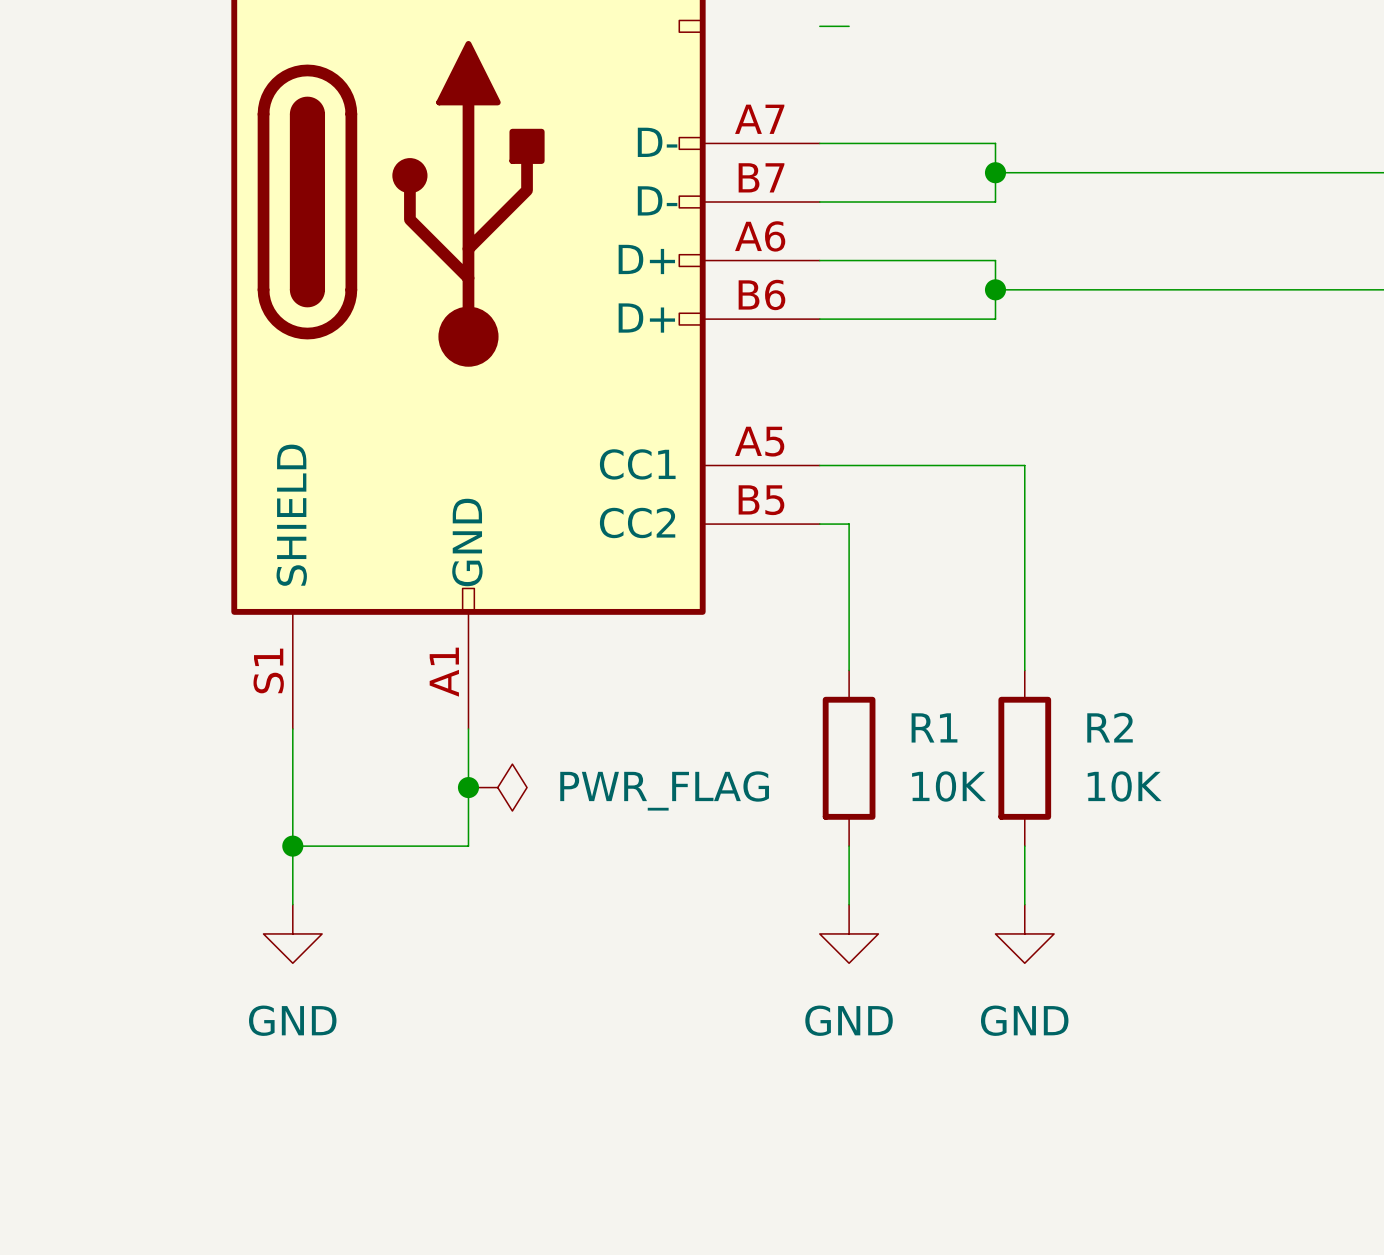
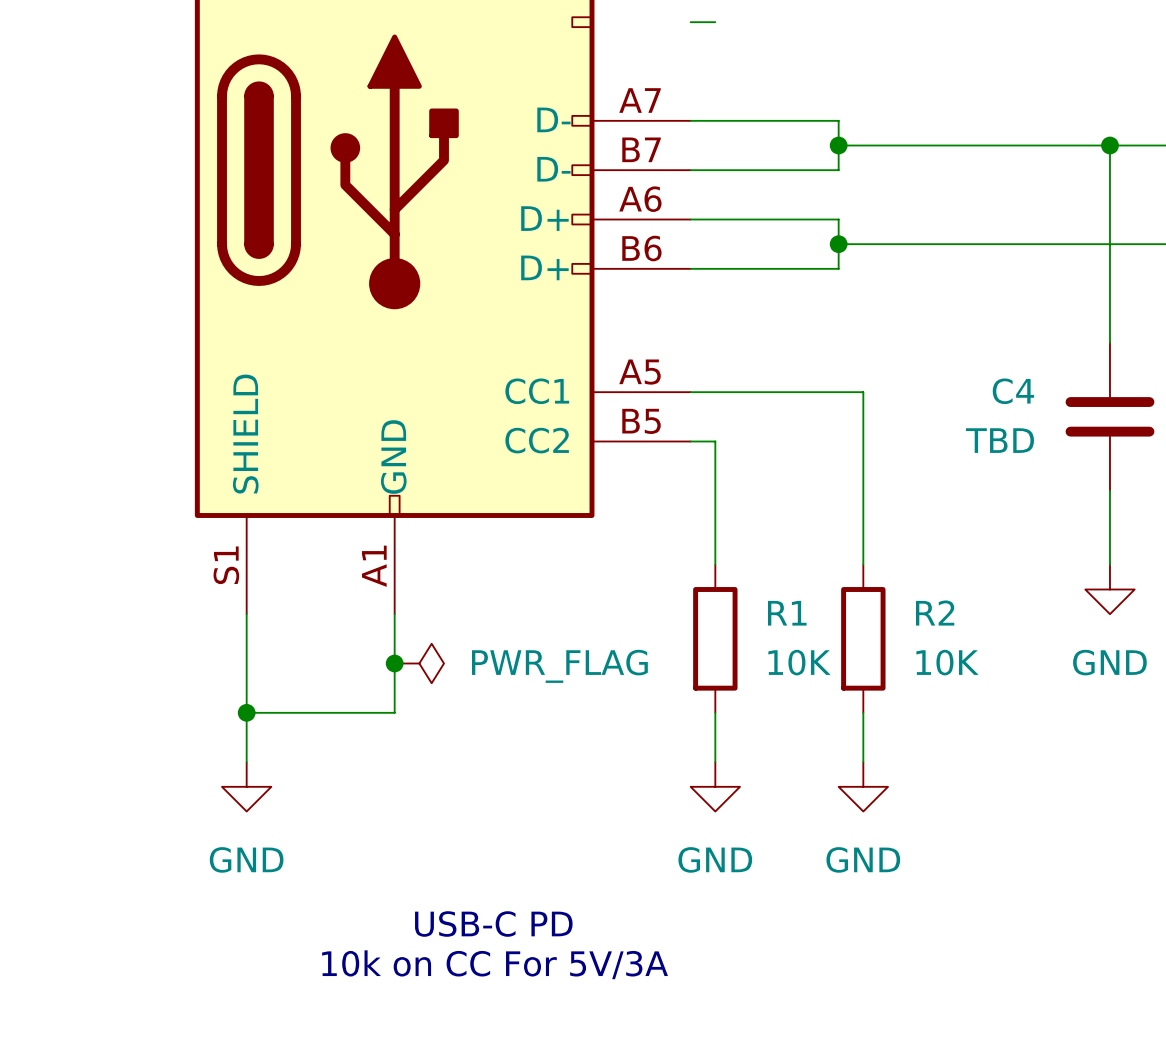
wire: none -> (1109, 145) (1109, 342)
junction: none -> (1109, 145)
C4: none -> TBD (1109, 416)
wire: none -> (1109, 490) (1109, 564)
power symbol: none -> GND (1109, 589)
text: none -> USB-C PD (493, 924)
text: none -> 10k on CC For 5V/3A (495, 964)

